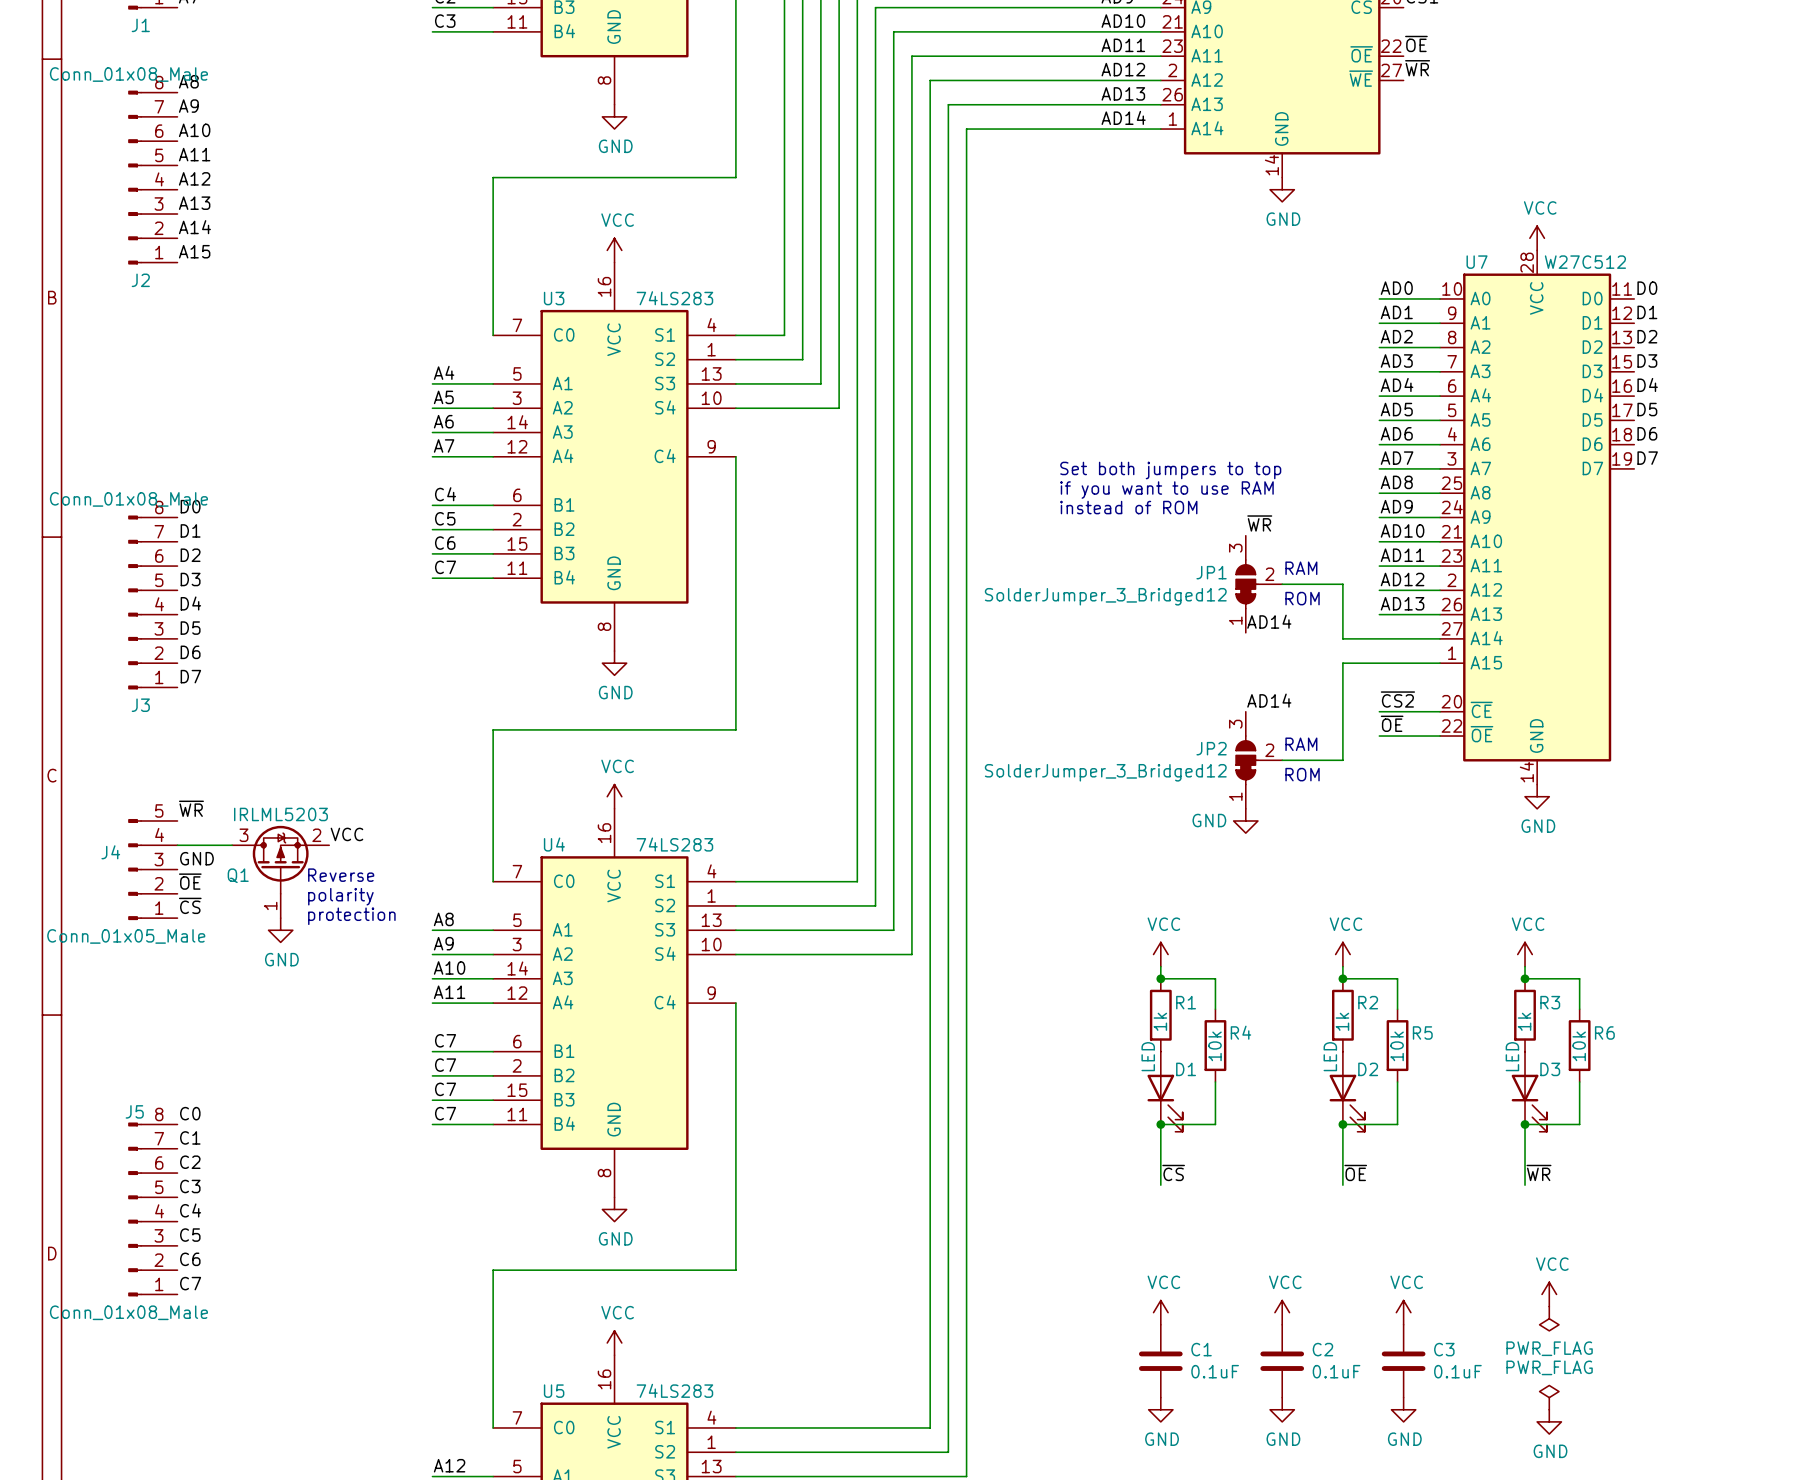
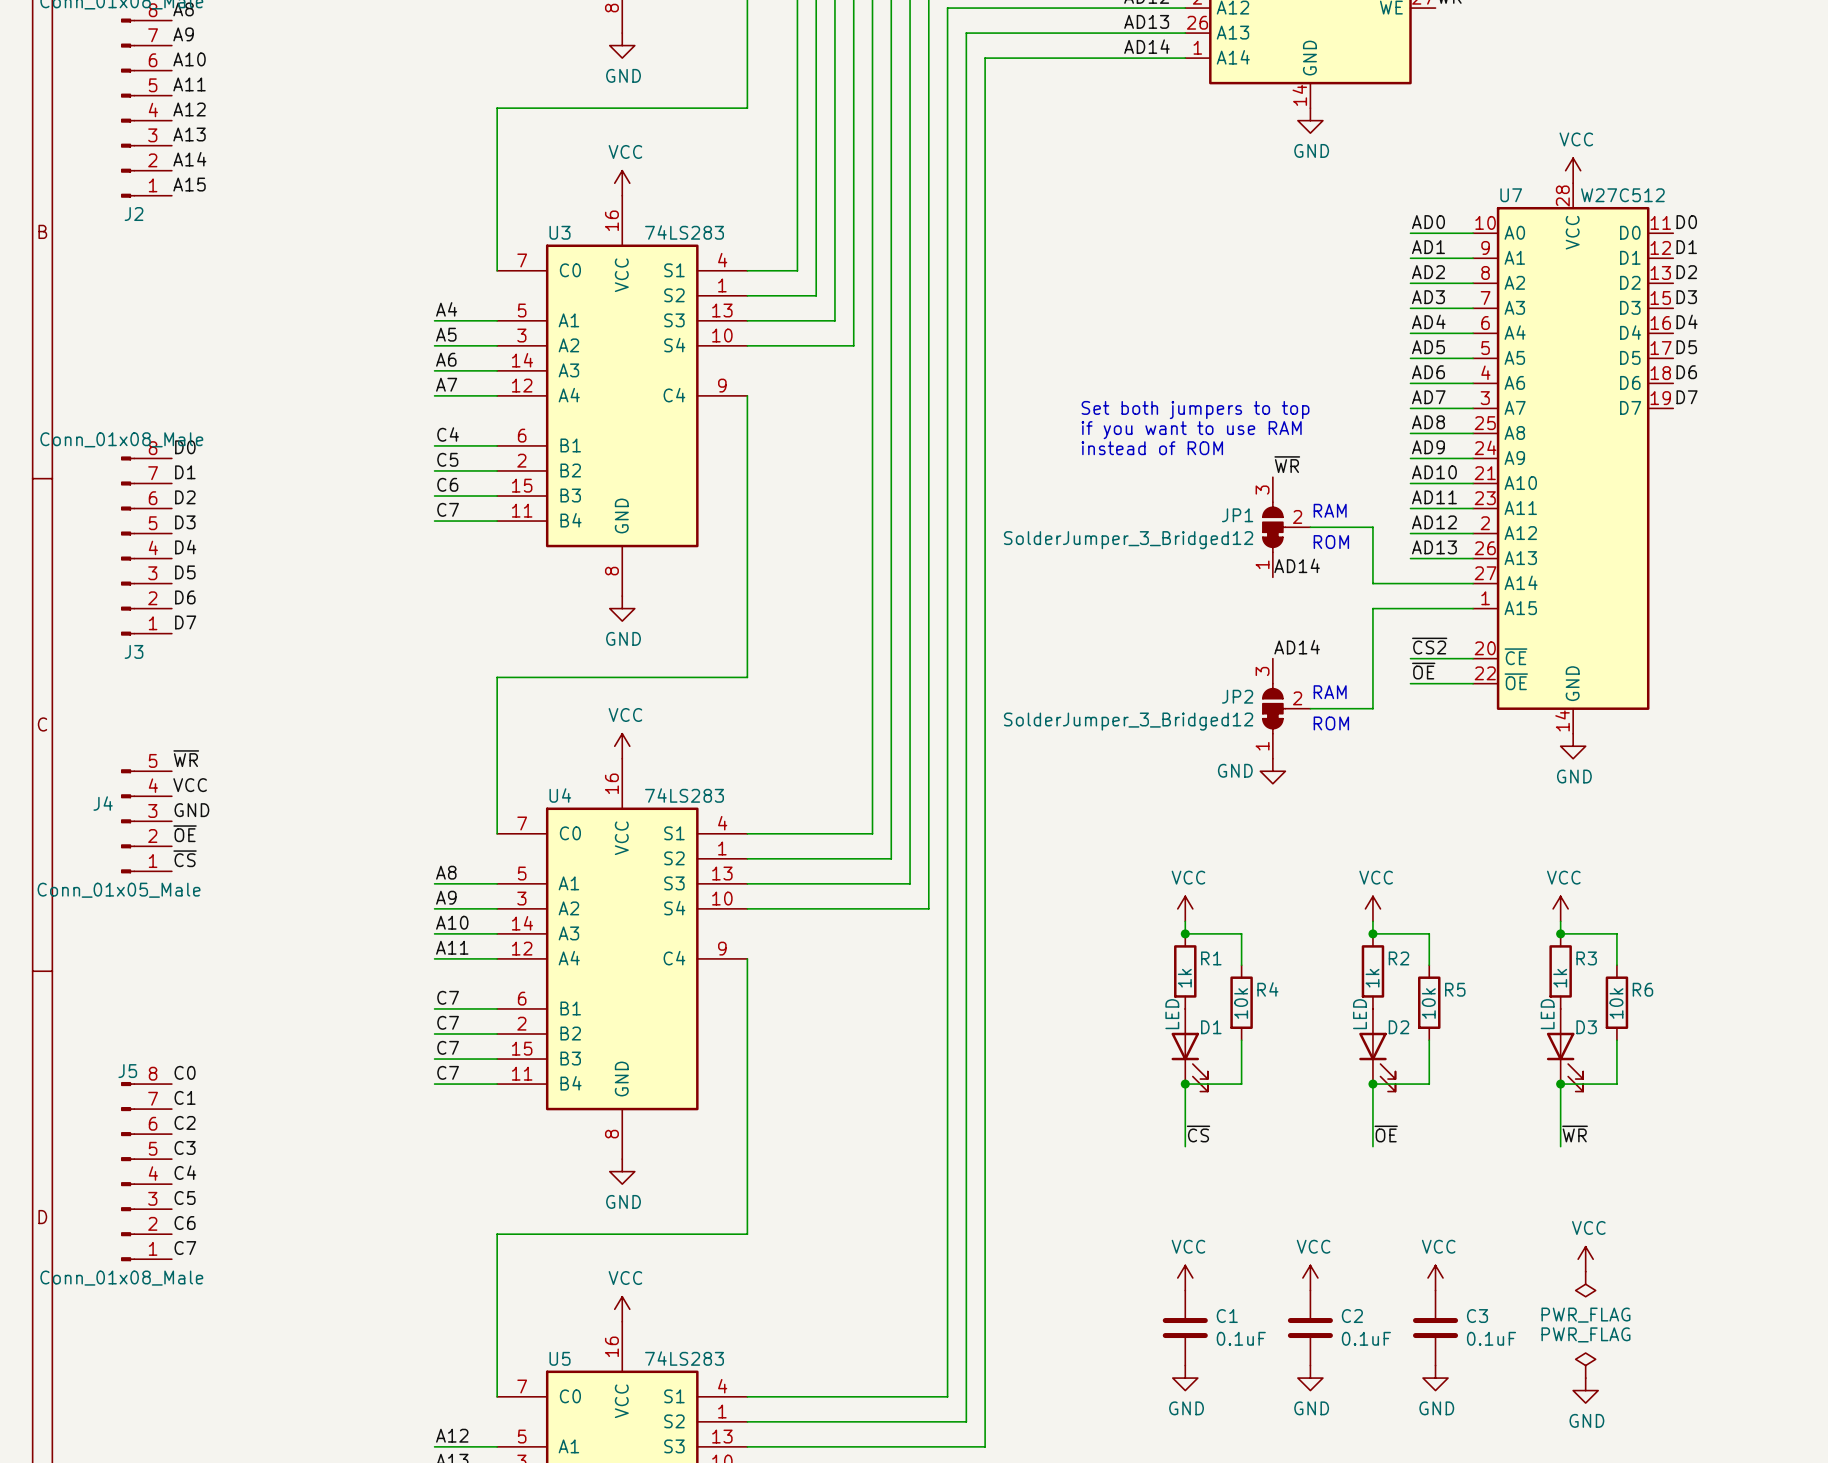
label position: VCC (346, 834) -> VCC (190, 785)
wire: (177, 845) (232, 845) -> none
Q1: IRLML5203 (280, 871) -> none
text: Reverse (341, 875) -> none
text: polarity (340, 896) -> none
text: protection (351, 916) -> none
power symbol: GND (280, 930) -> none

